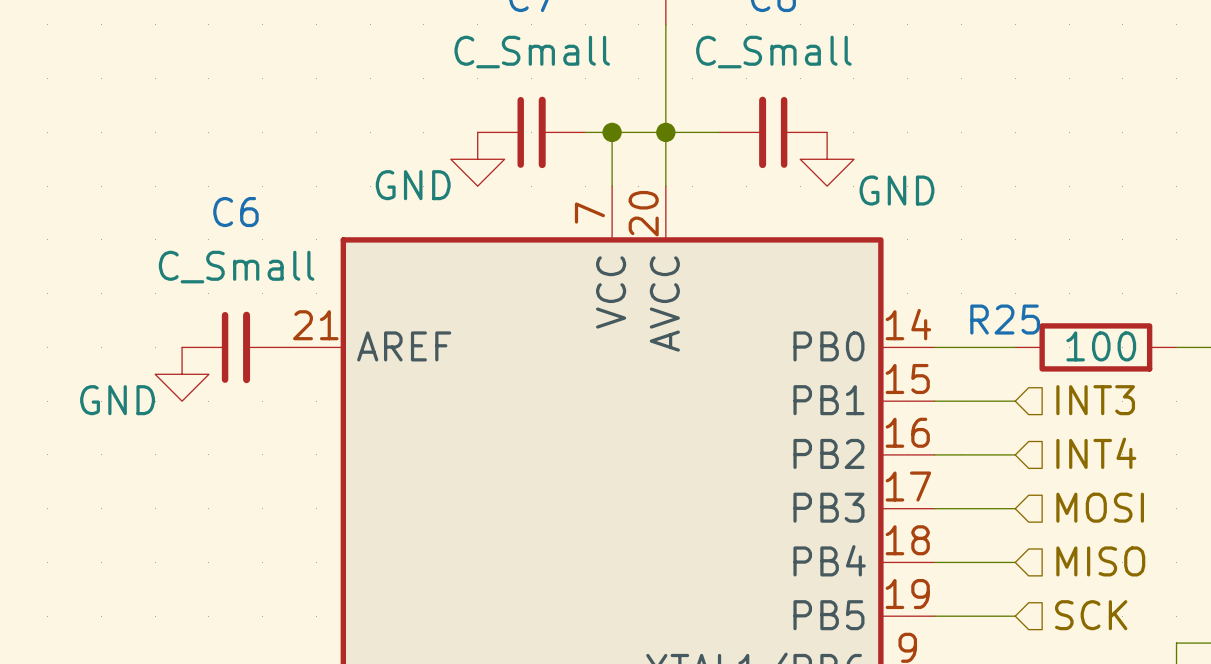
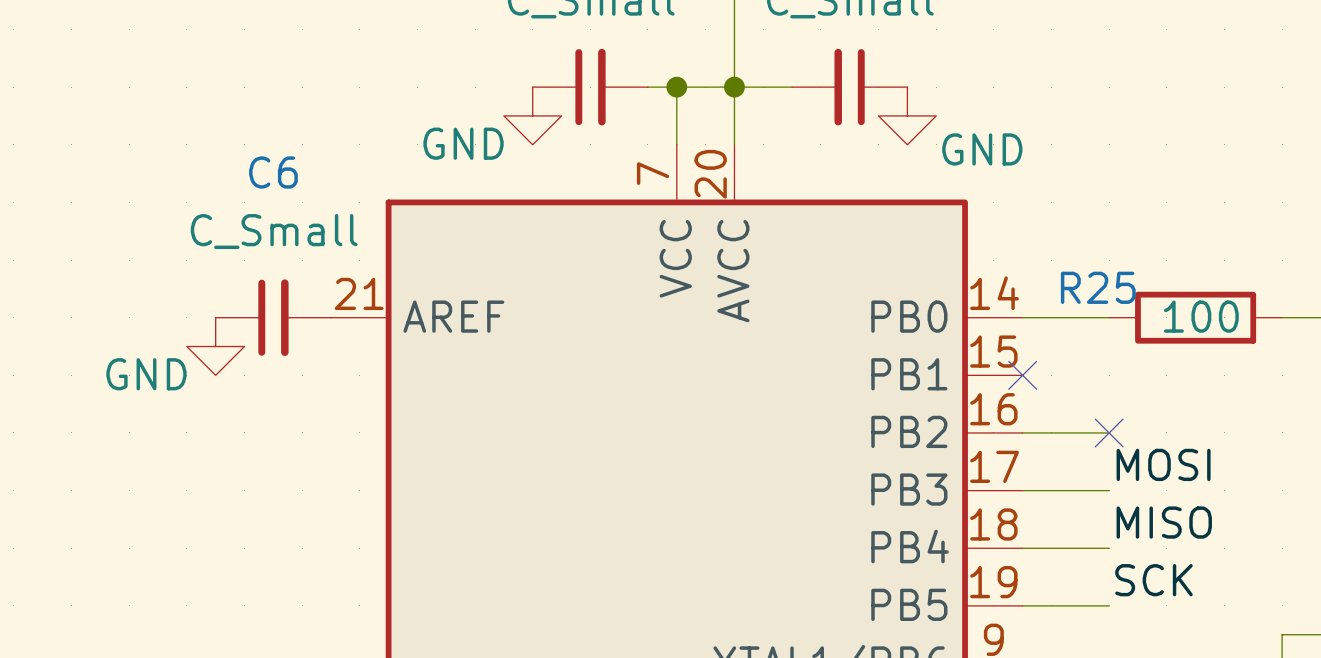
hierarchical label: INT3 (1095, 400) -> none
wire: (934, 401) (1015, 401) -> none
no-connect mark: none -> (1022, 375)
hierarchical label: INT4 (1096, 453) -> none
no-connect mark: none -> (1109, 432)
label: none -> MOSI (1163, 464)
hierarchical label: MOSI (1100, 507) -> none
label: none -> MISO (1164, 522)
hierarchical label: MISO (1100, 561) -> none
label: none -> SCK (1153, 580)
hierarchical label: SCK (1091, 615) -> none

